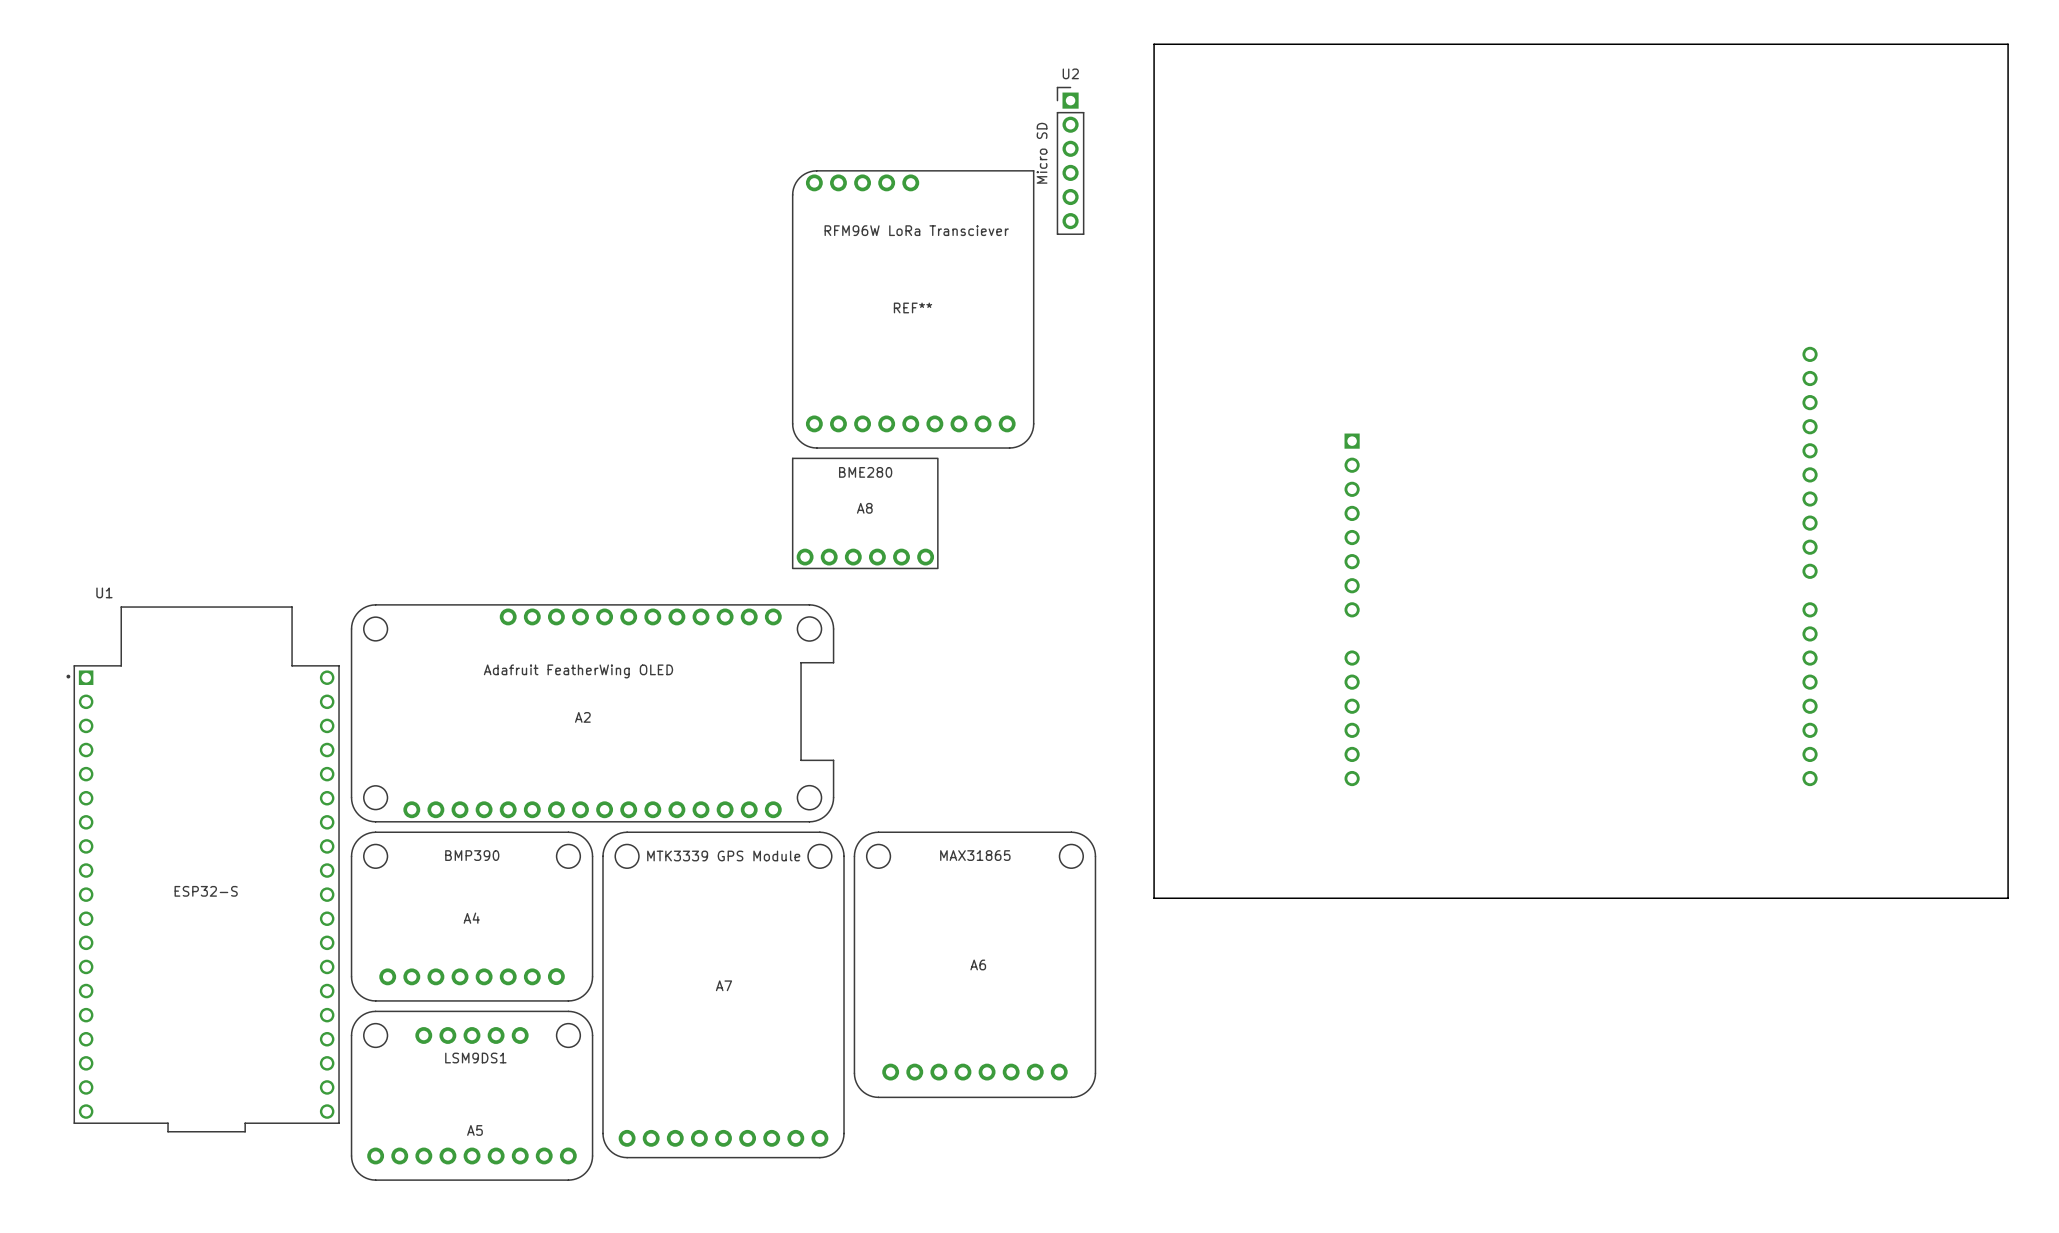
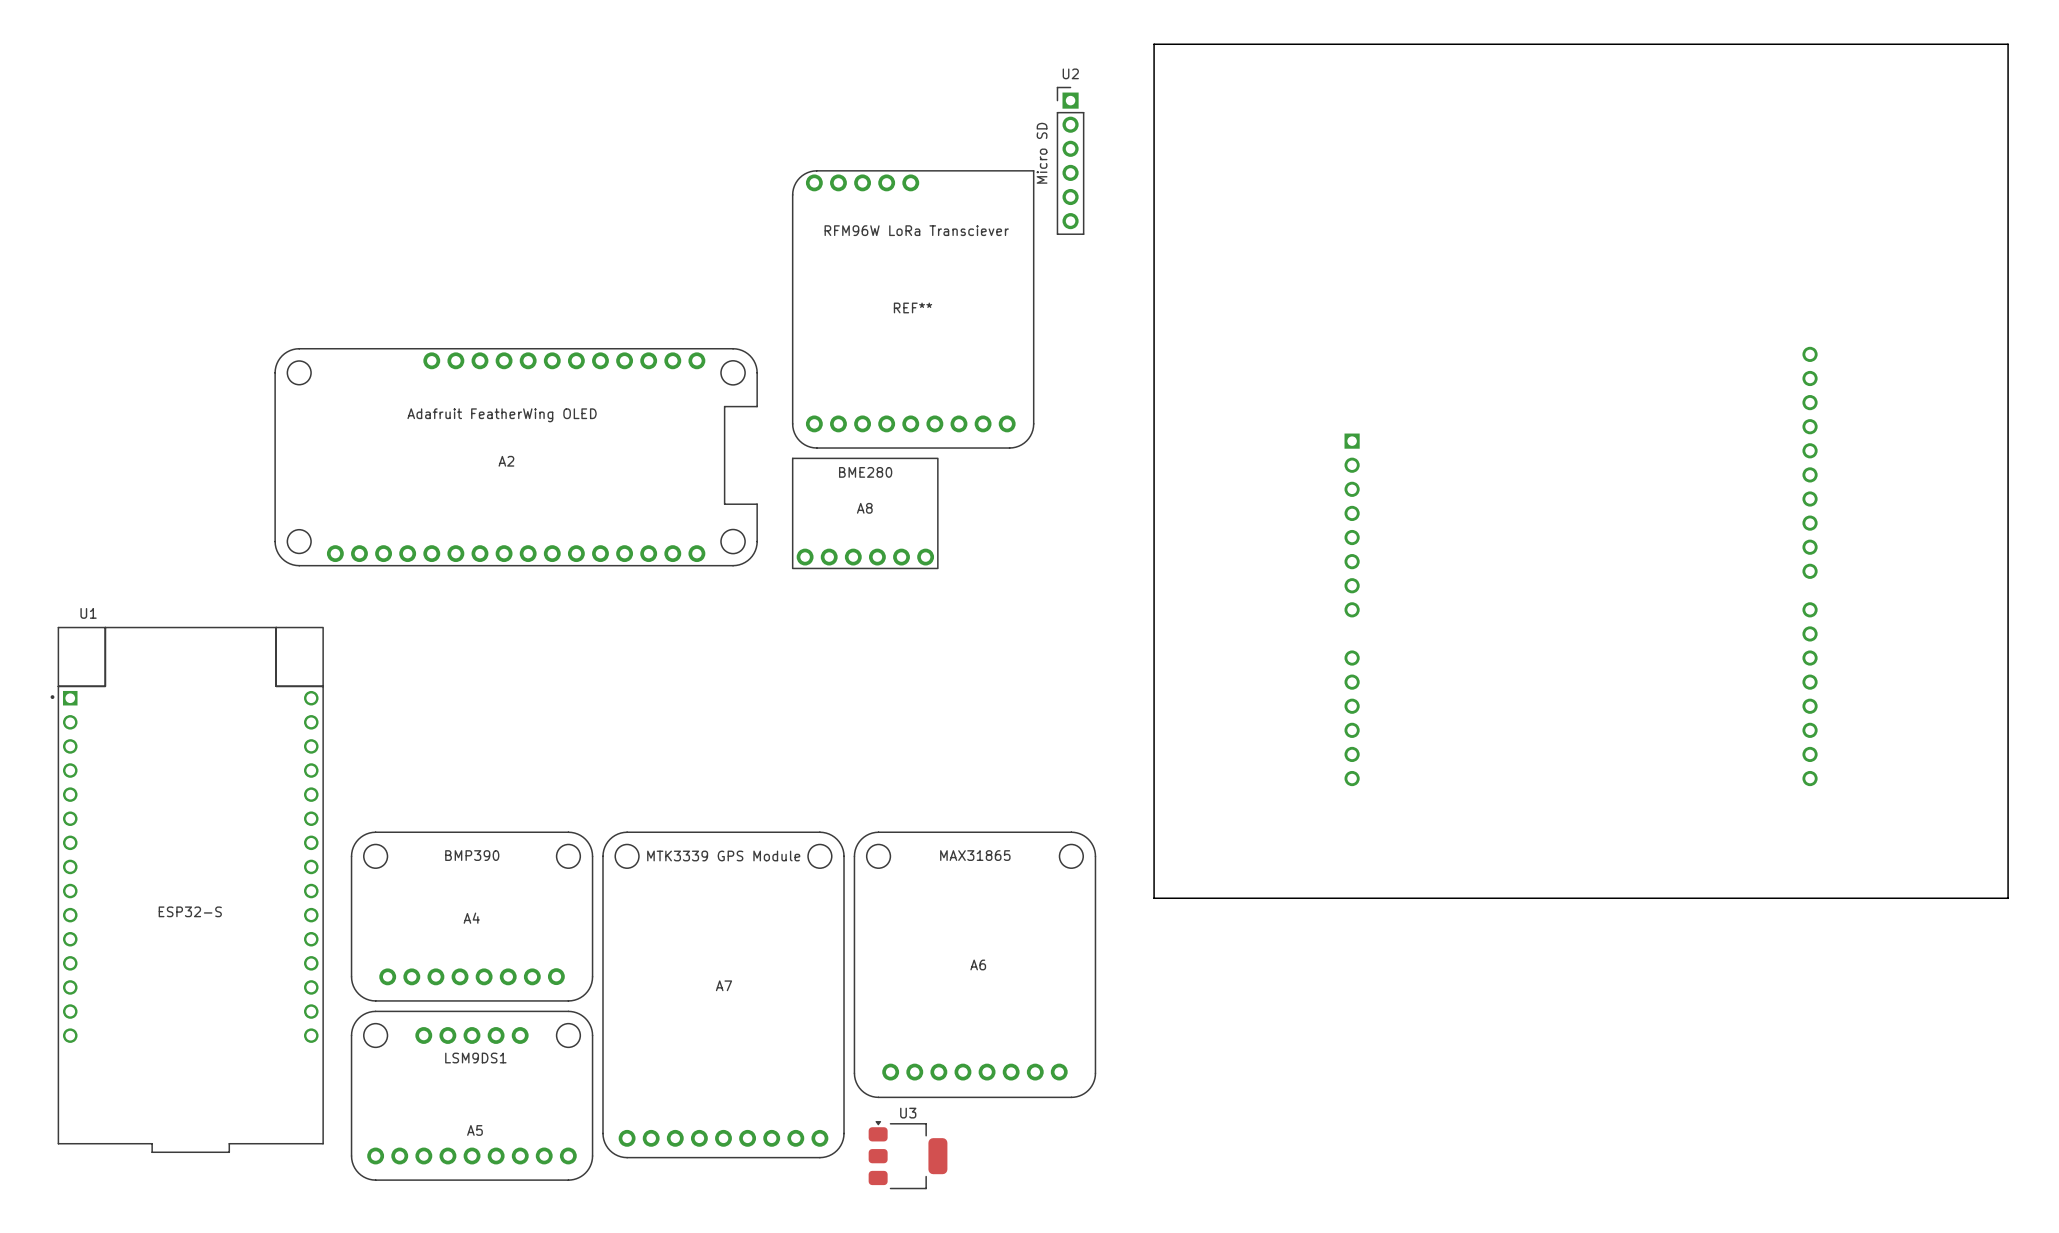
U1 footprint: [66, 606, 340, 1133] -> [50, 626, 324, 1153]
A2 position: (592, 713) -> (516, 457)
U3: none -> (908, 1155)

